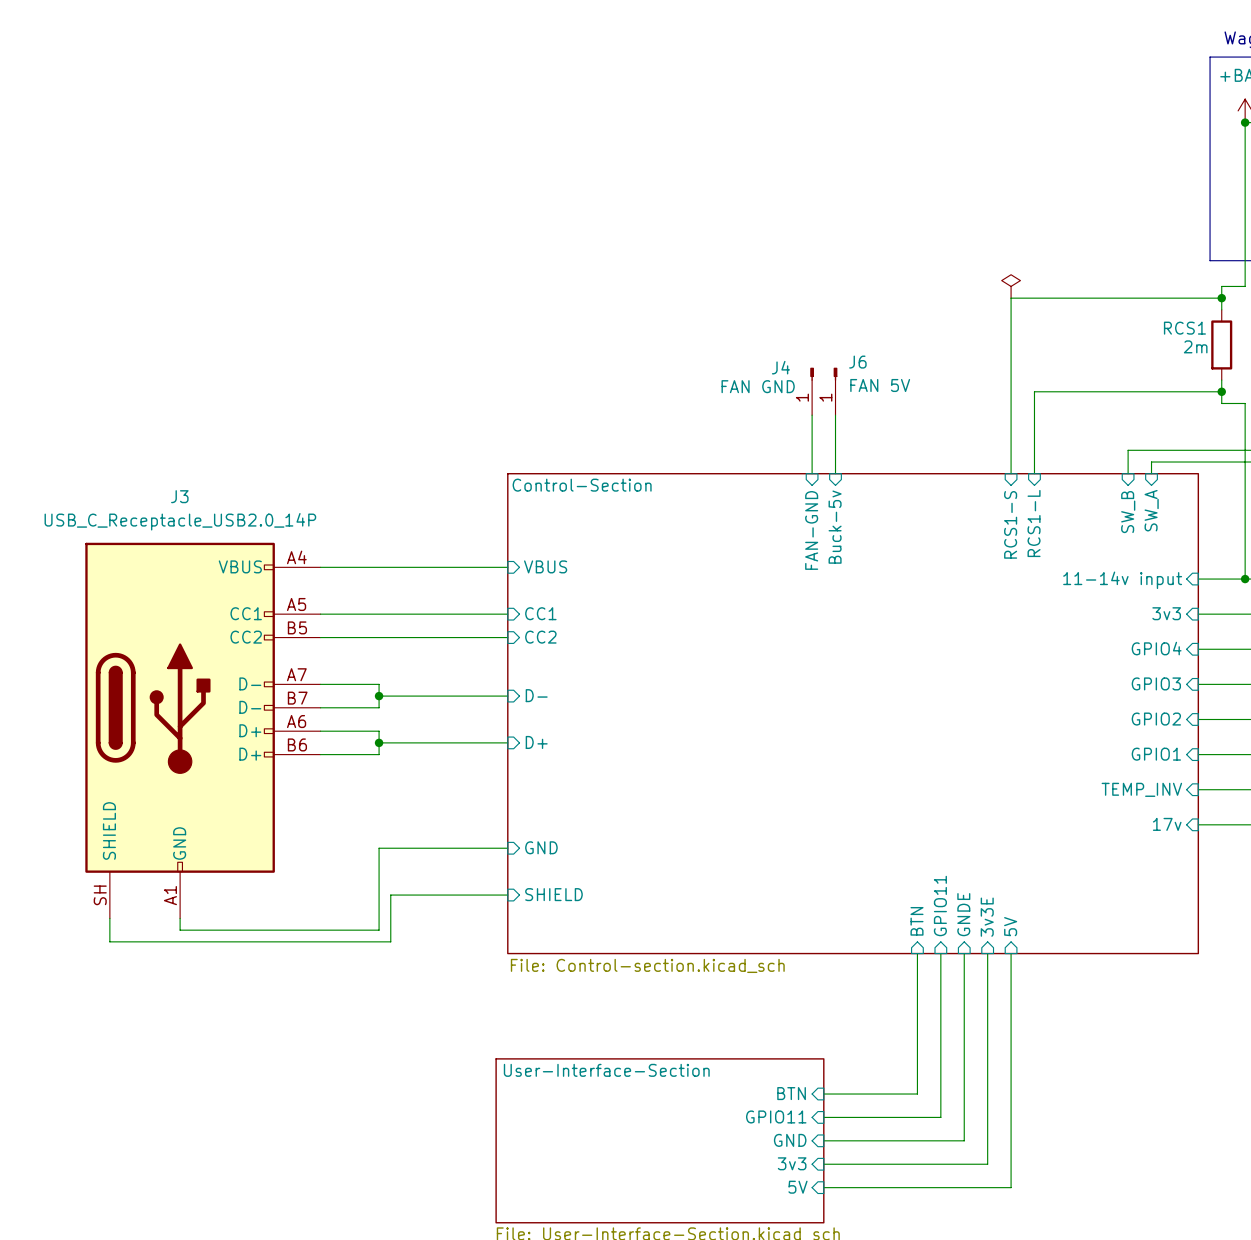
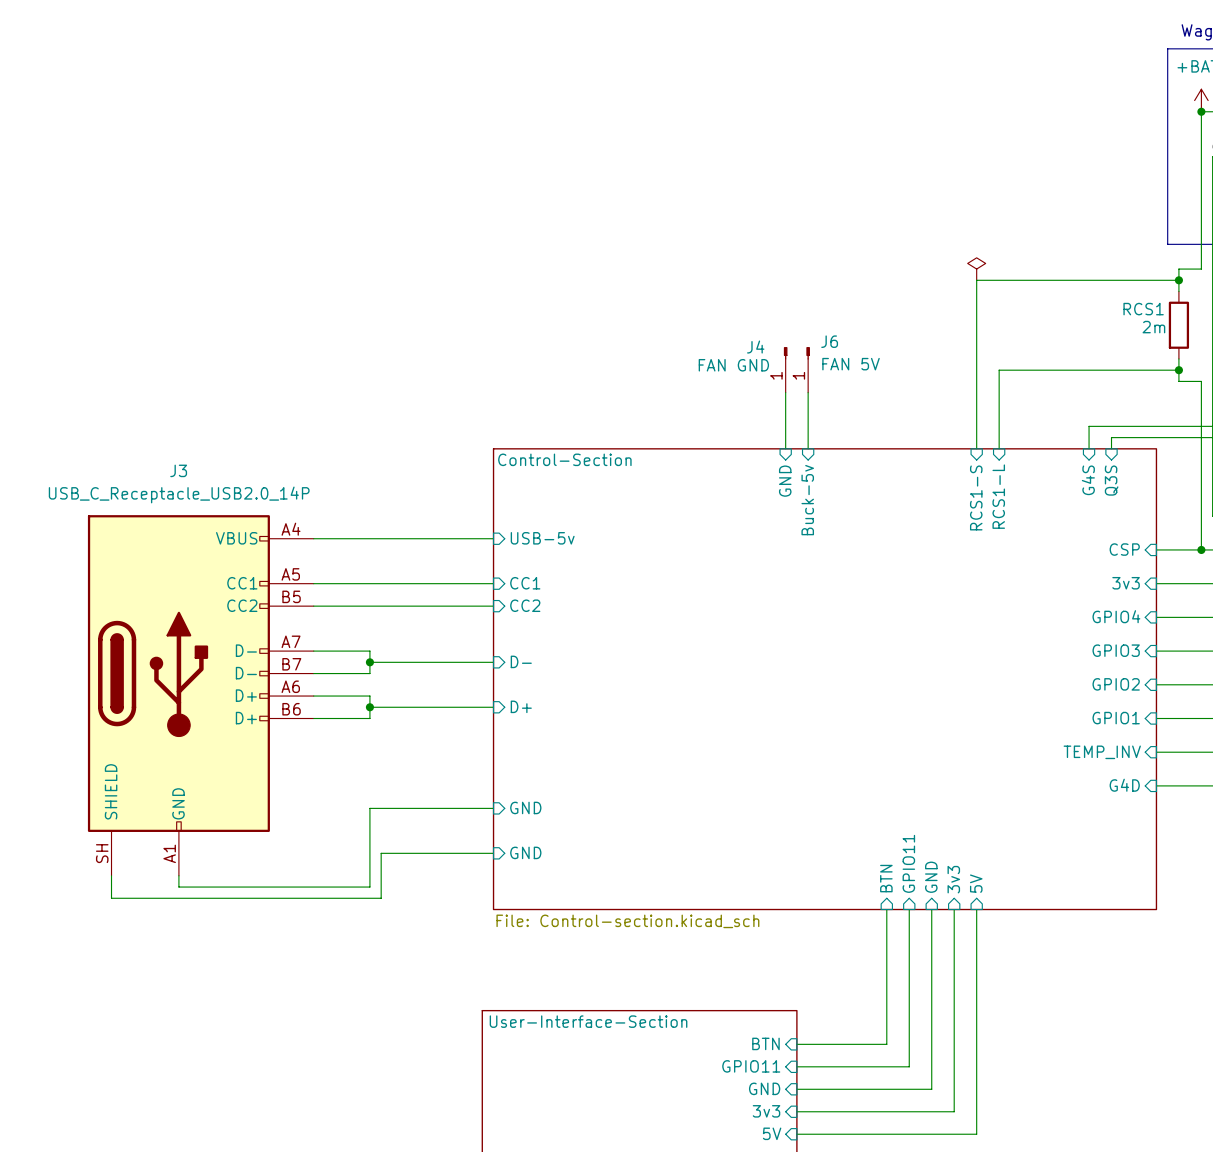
sheet pin: SW_A (1151, 510) -> Q3S (1111, 480)
sheet pin: SW_B (1128, 512) -> G4S (1088, 480)
sheet pin: FAN-GND (811, 530) -> GND (785, 481)
sheet pin: VBUS (545, 566) -> USB-5v (542, 538)
sheet pin: 11-14v input (1122, 580) -> CSP (1124, 549)
sheet pin: 17v (1167, 824) -> G4D (1124, 785)
sheet pin: SHIELD (553, 894) -> GND (525, 852)
sheet pin: GNDE (963, 914) -> GND (931, 877)
sheet pin: 3v3E (987, 917) -> 3v3 (953, 879)

